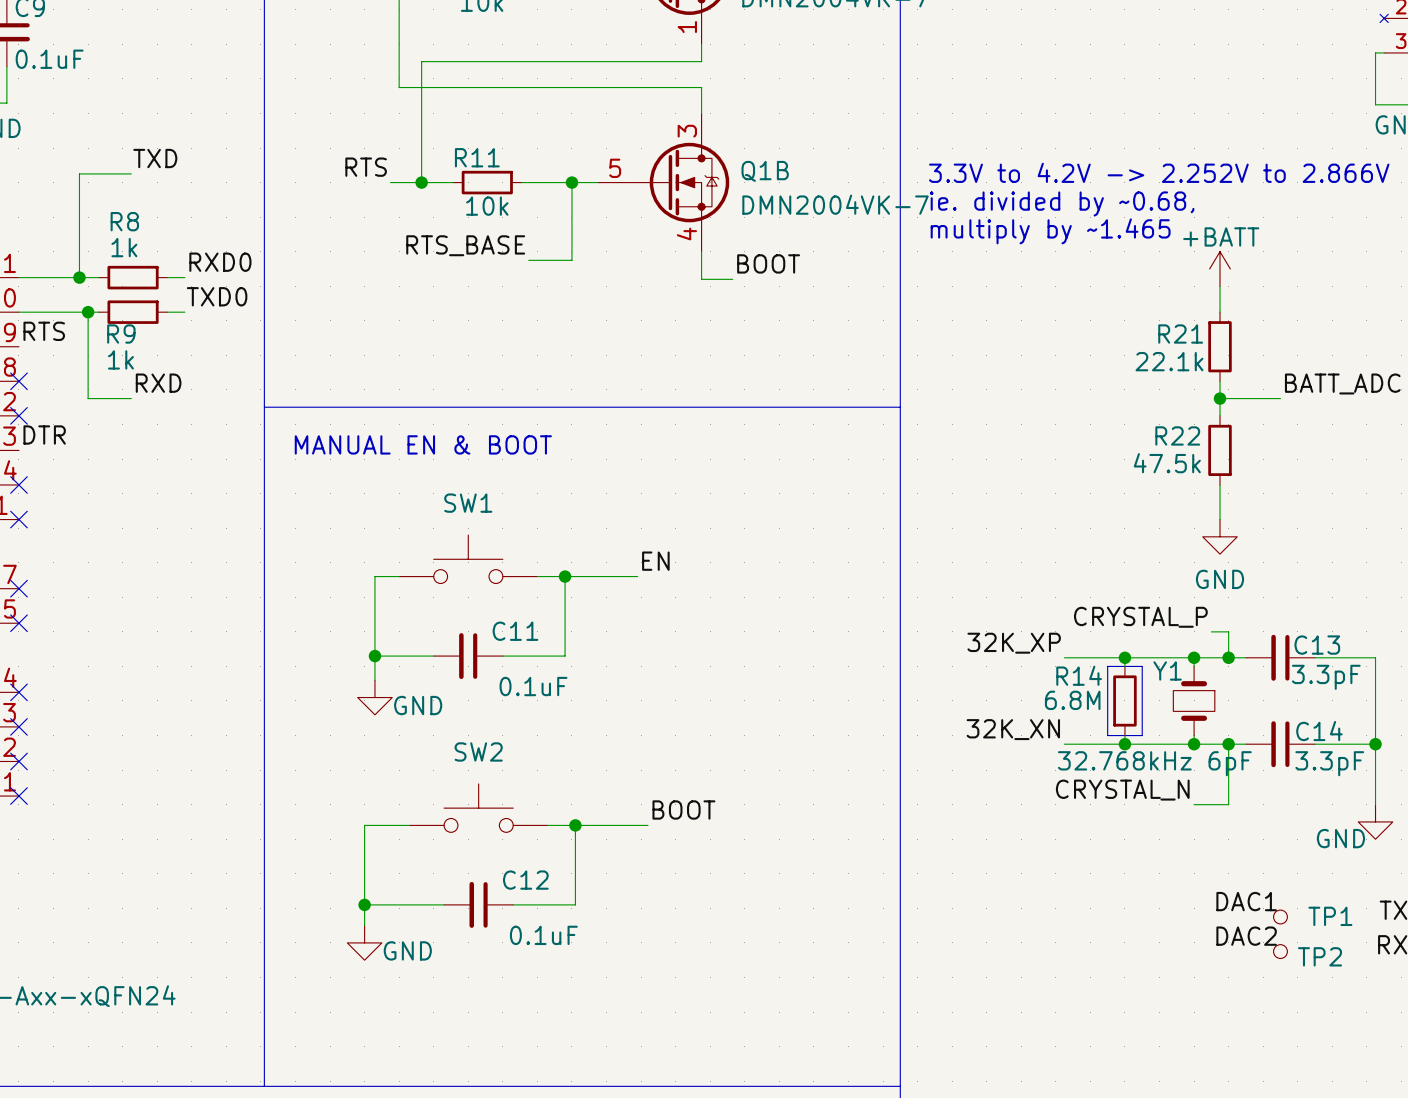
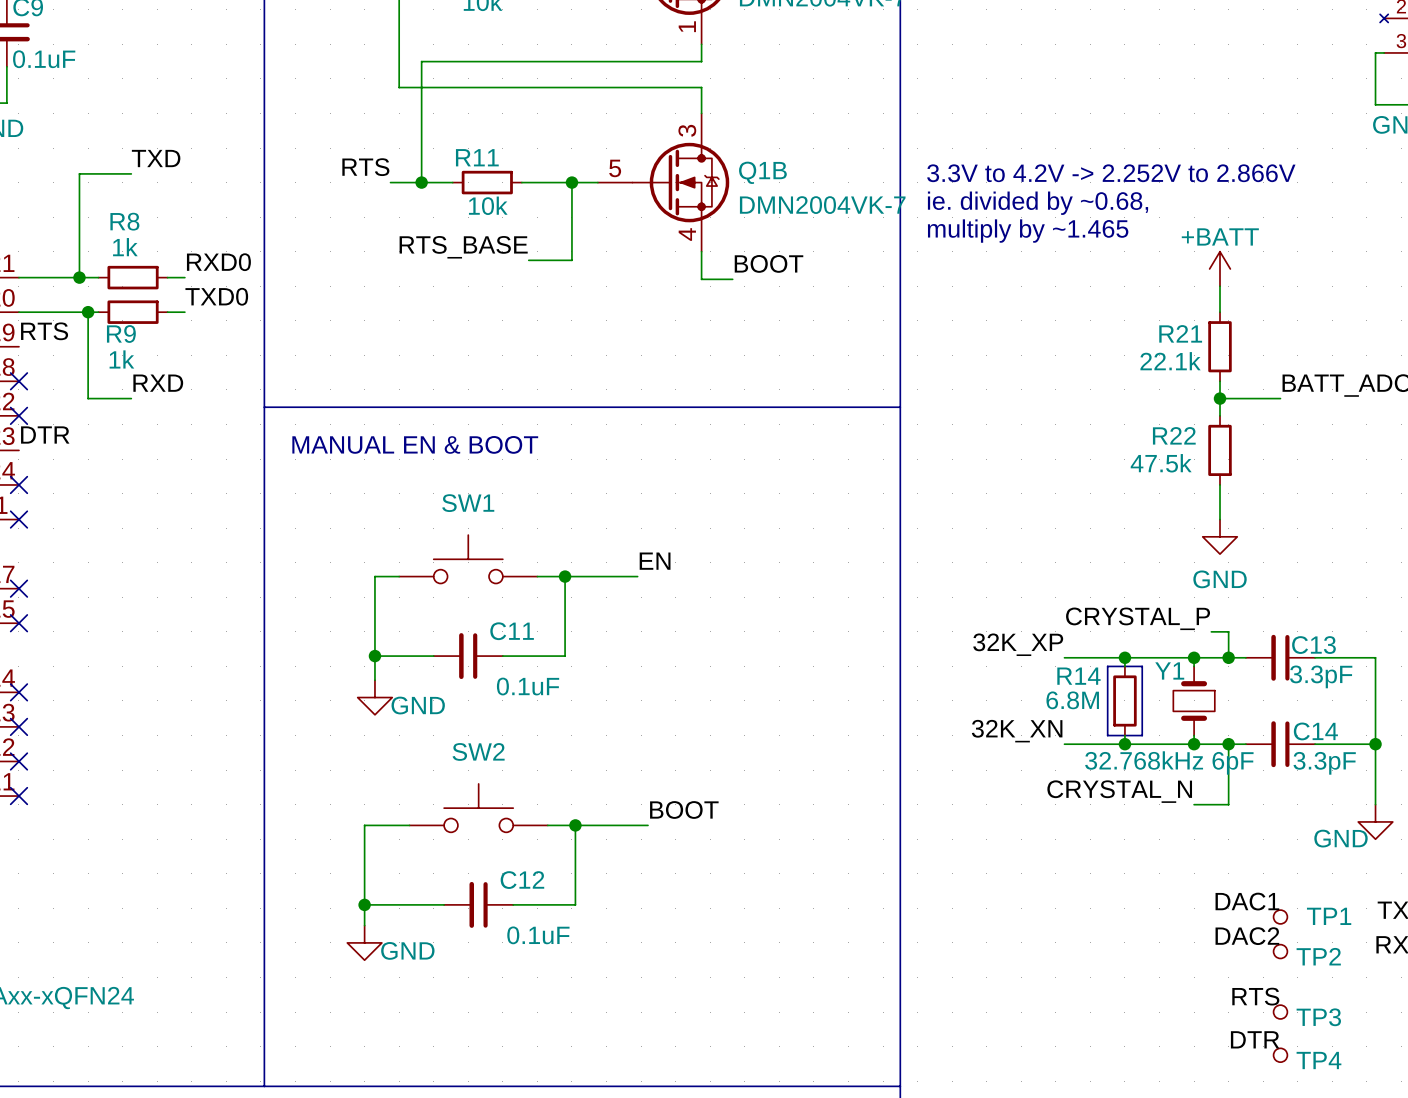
label: none -> RTS (1255, 996)
TP3: none -> (1280, 1012)
label: none -> DTR (1255, 1039)
TP4: none -> (1280, 1055)

